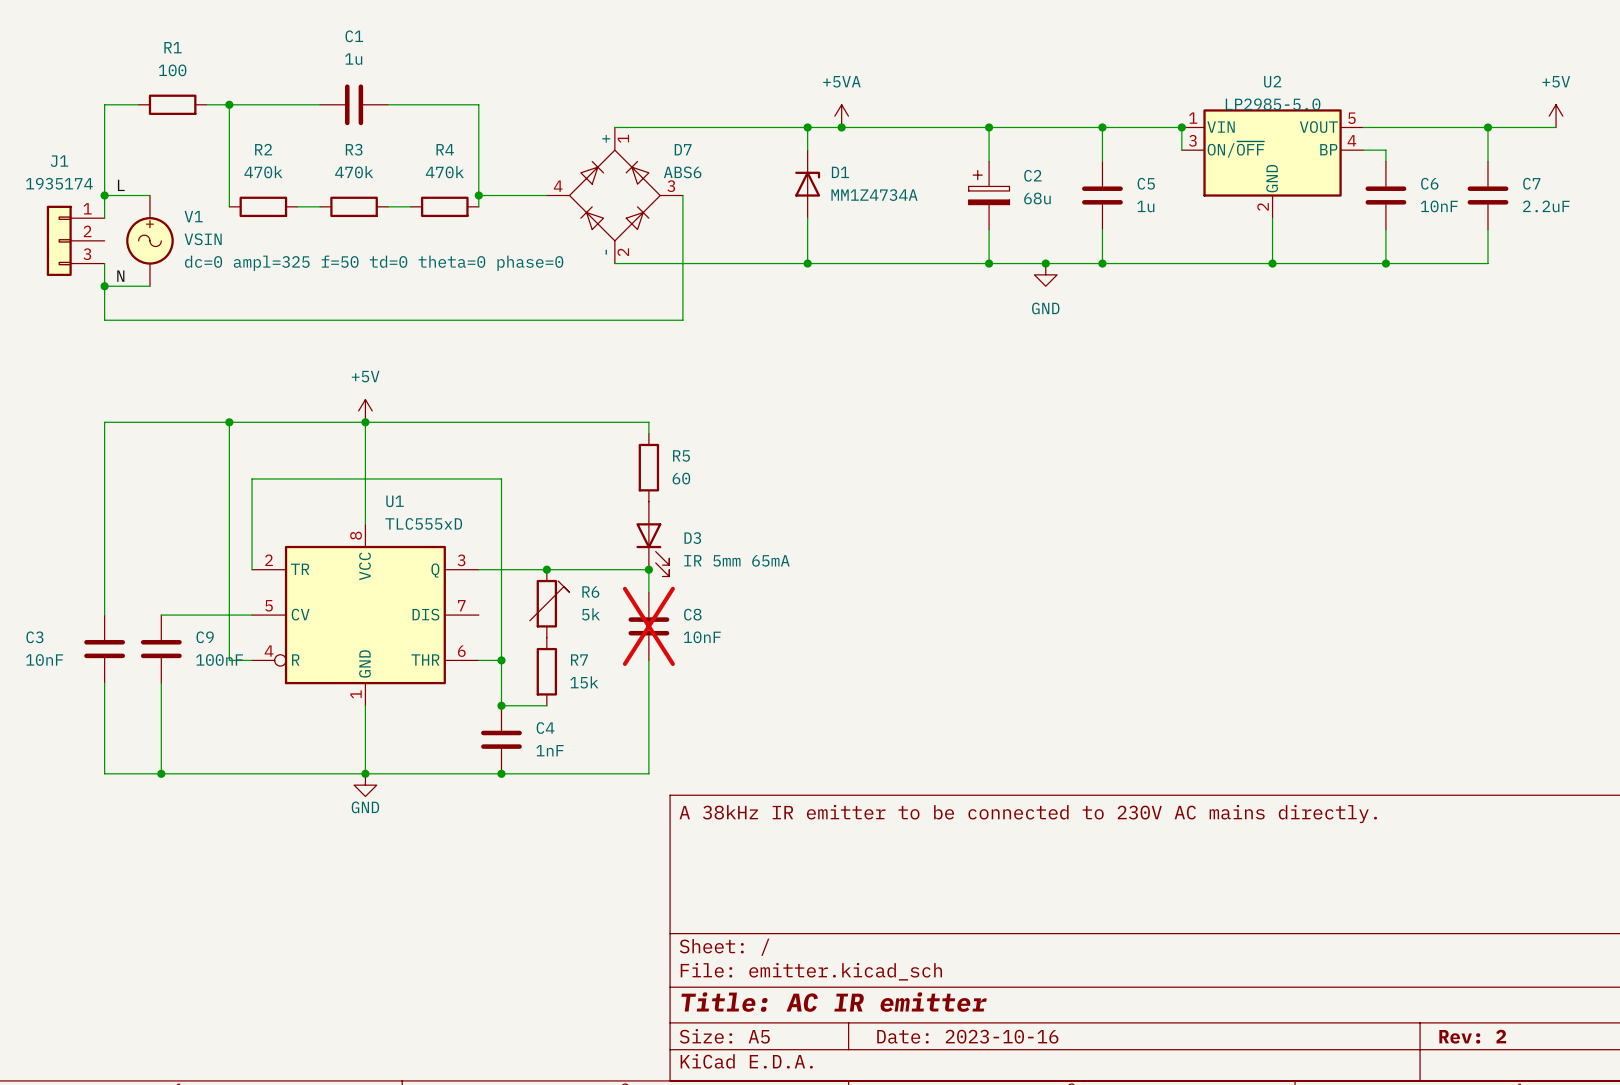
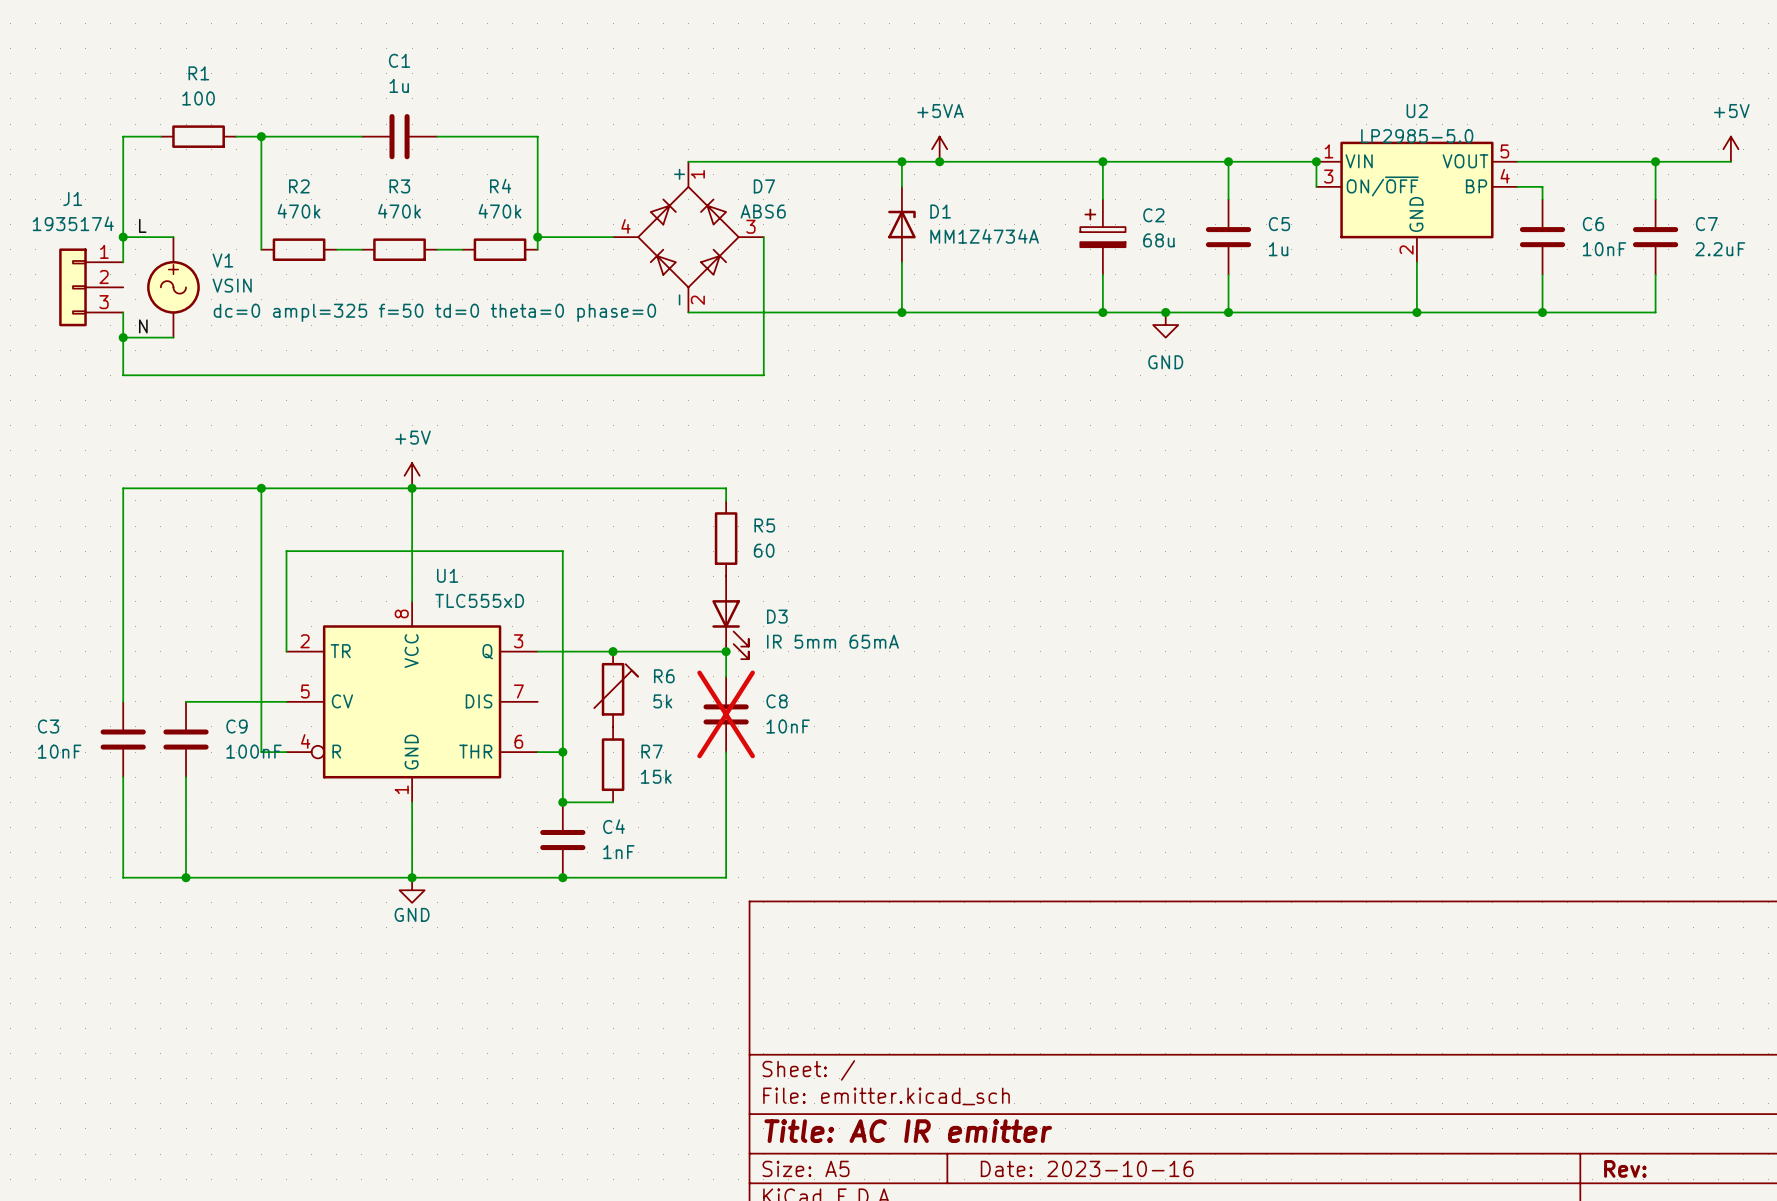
title block: A 38kHz IR emitter to be connected to 230V AC mains directly. (1028, 814) -> none
title block: Rev: 2 (1472, 1036) -> Rev: (1625, 1168)

